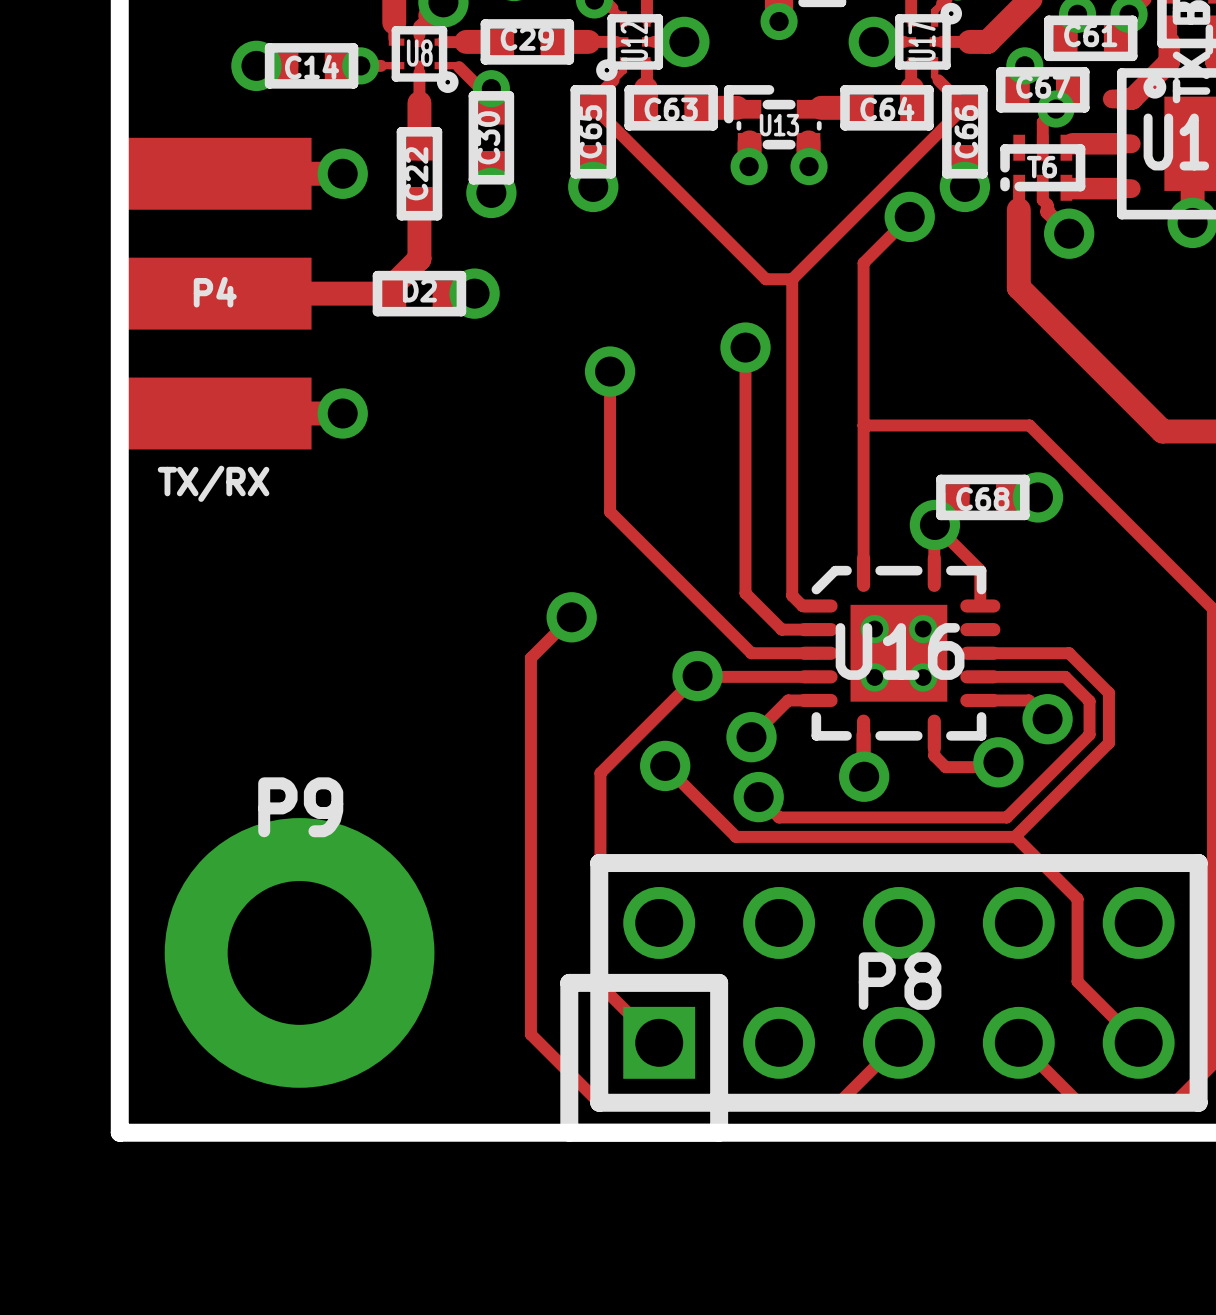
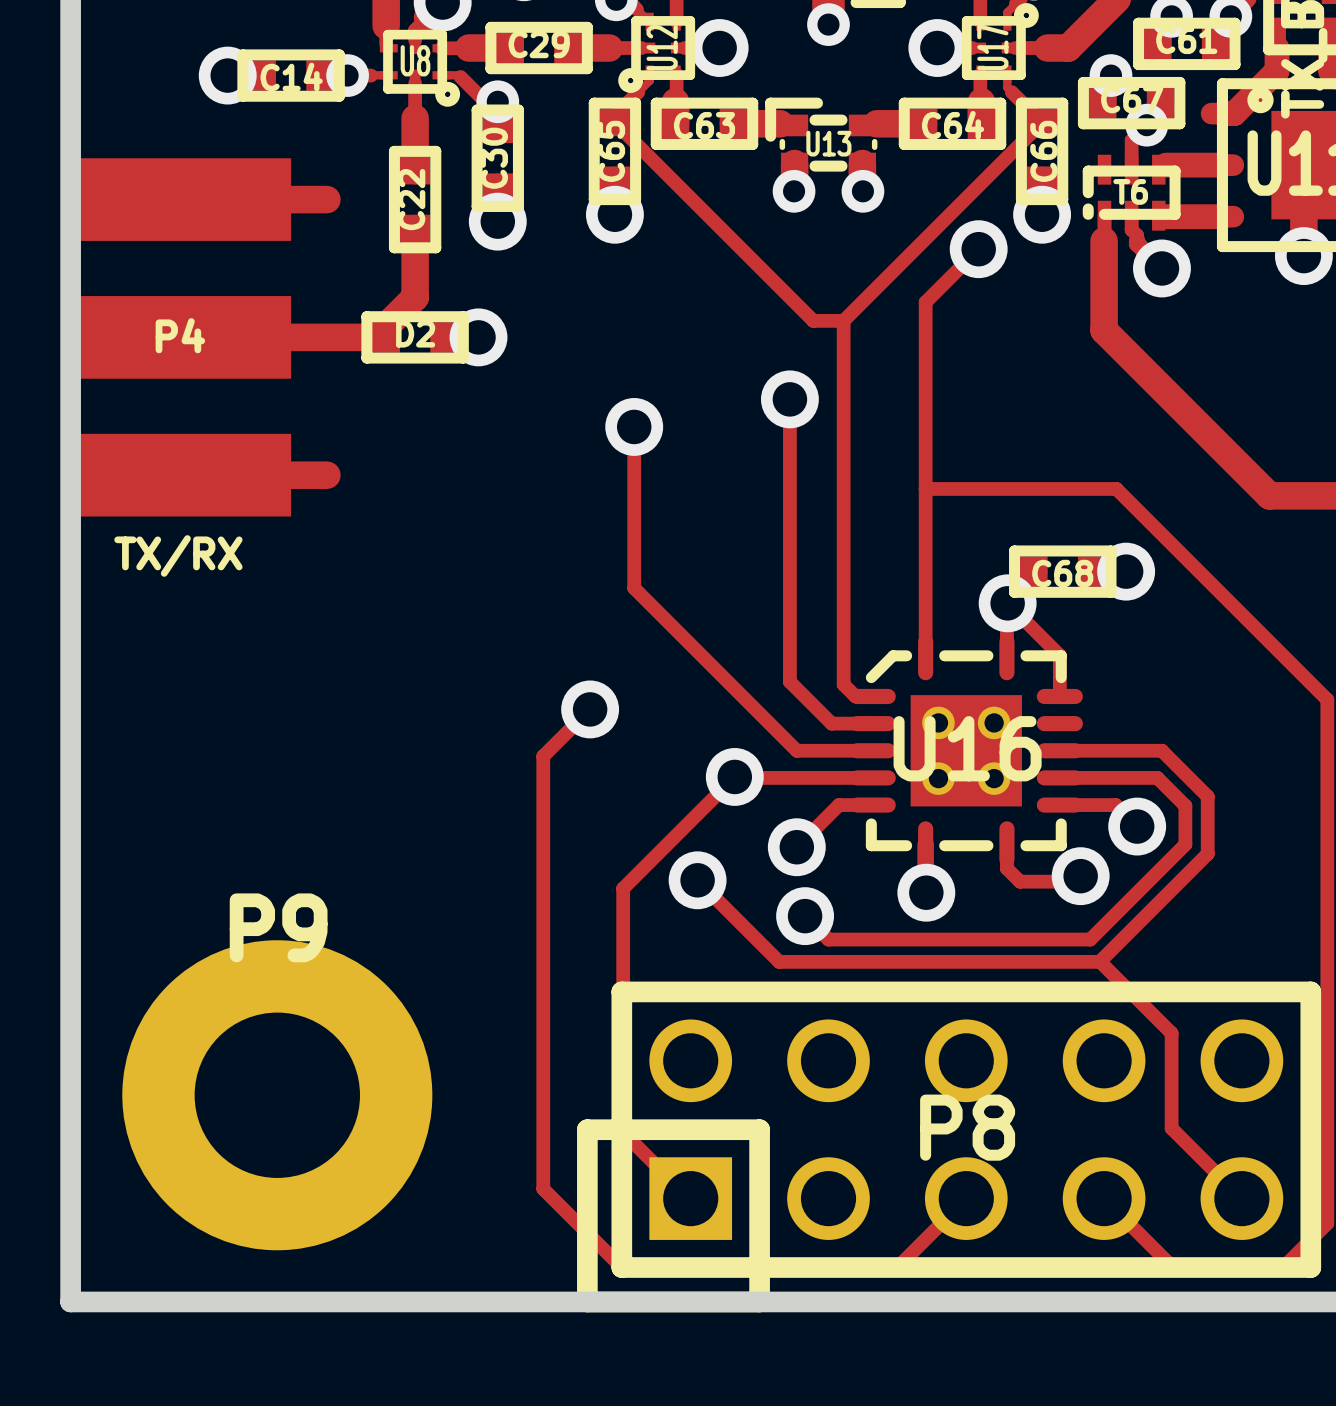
via: (342, 173) -> none
via: (342, 413) -> none

